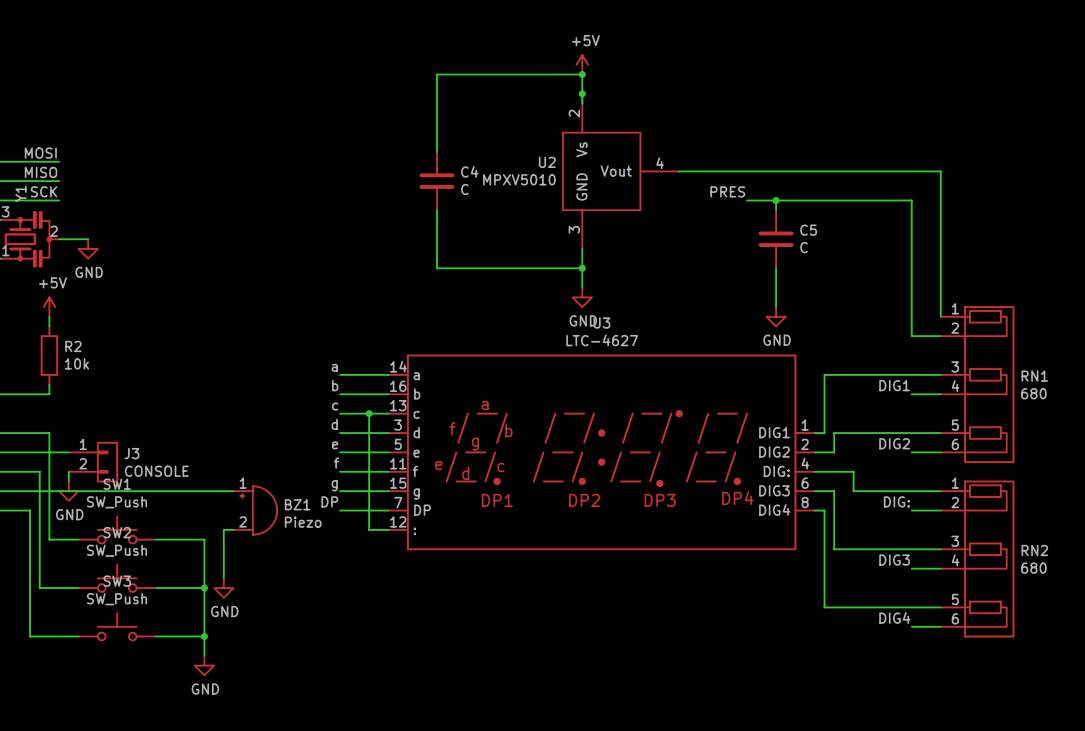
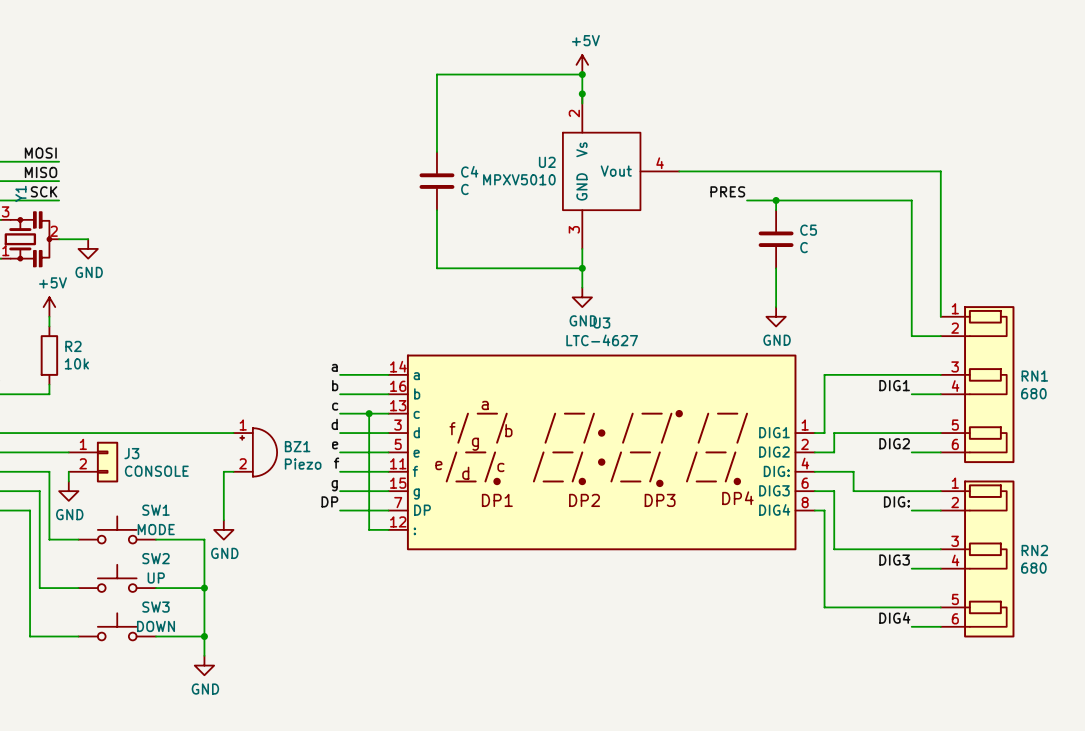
wire: (49, 433) (49, 471) -> (39, 471) (49, 471)
wire: none -> (49, 433) (233, 433)
wire: (39, 471) (39, 491) (233, 491) -> none
SW1 name position: SW1 (117, 484) -> SW1 (156, 510)
SW1 value: SW_Push (117, 502) -> MODE (156, 529)
BZ1 position: (255, 510) -> (255, 452)
wire: (233, 529) (223, 529) (223, 578) -> (233, 471) (223, 471) (223, 520)
SW2 name position: SW2 (117, 532) -> SW2 (156, 558)
SW2 value: SW_Push (117, 550) -> UP (156, 578)
SW3 name position: SW3 (117, 581) -> SW3 (156, 607)
power symbol position: GND (223, 588) -> GND (223, 529)
SW3 value: SW_Push (117, 599) -> DOWN (156, 626)

